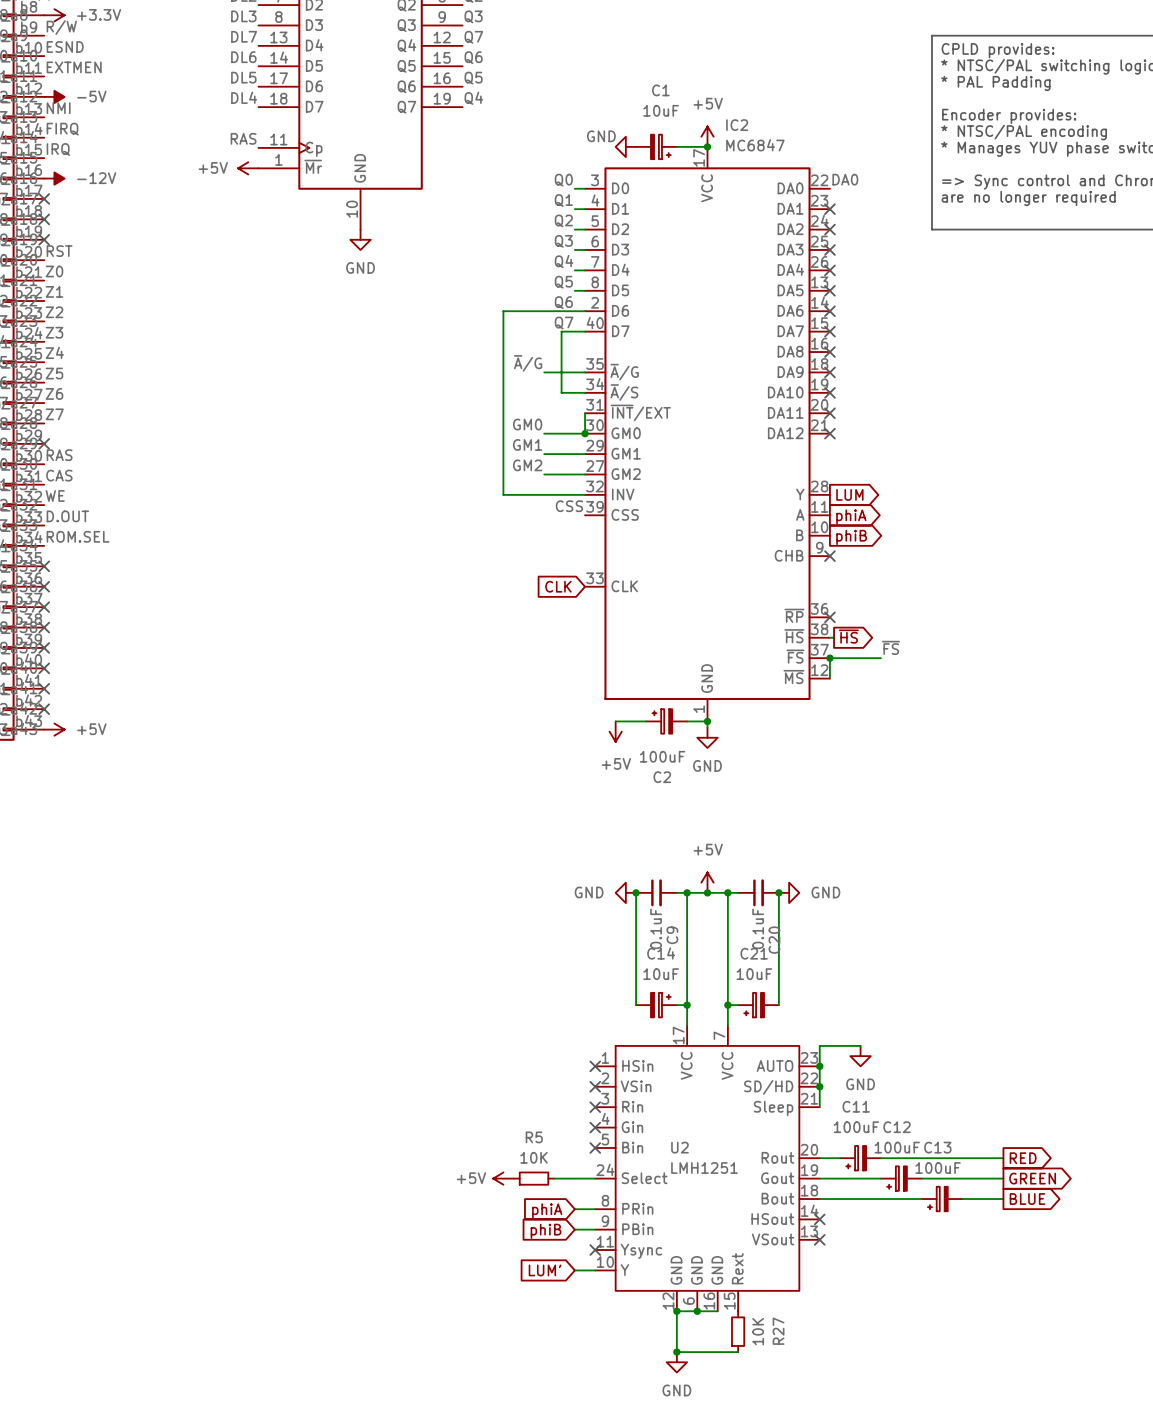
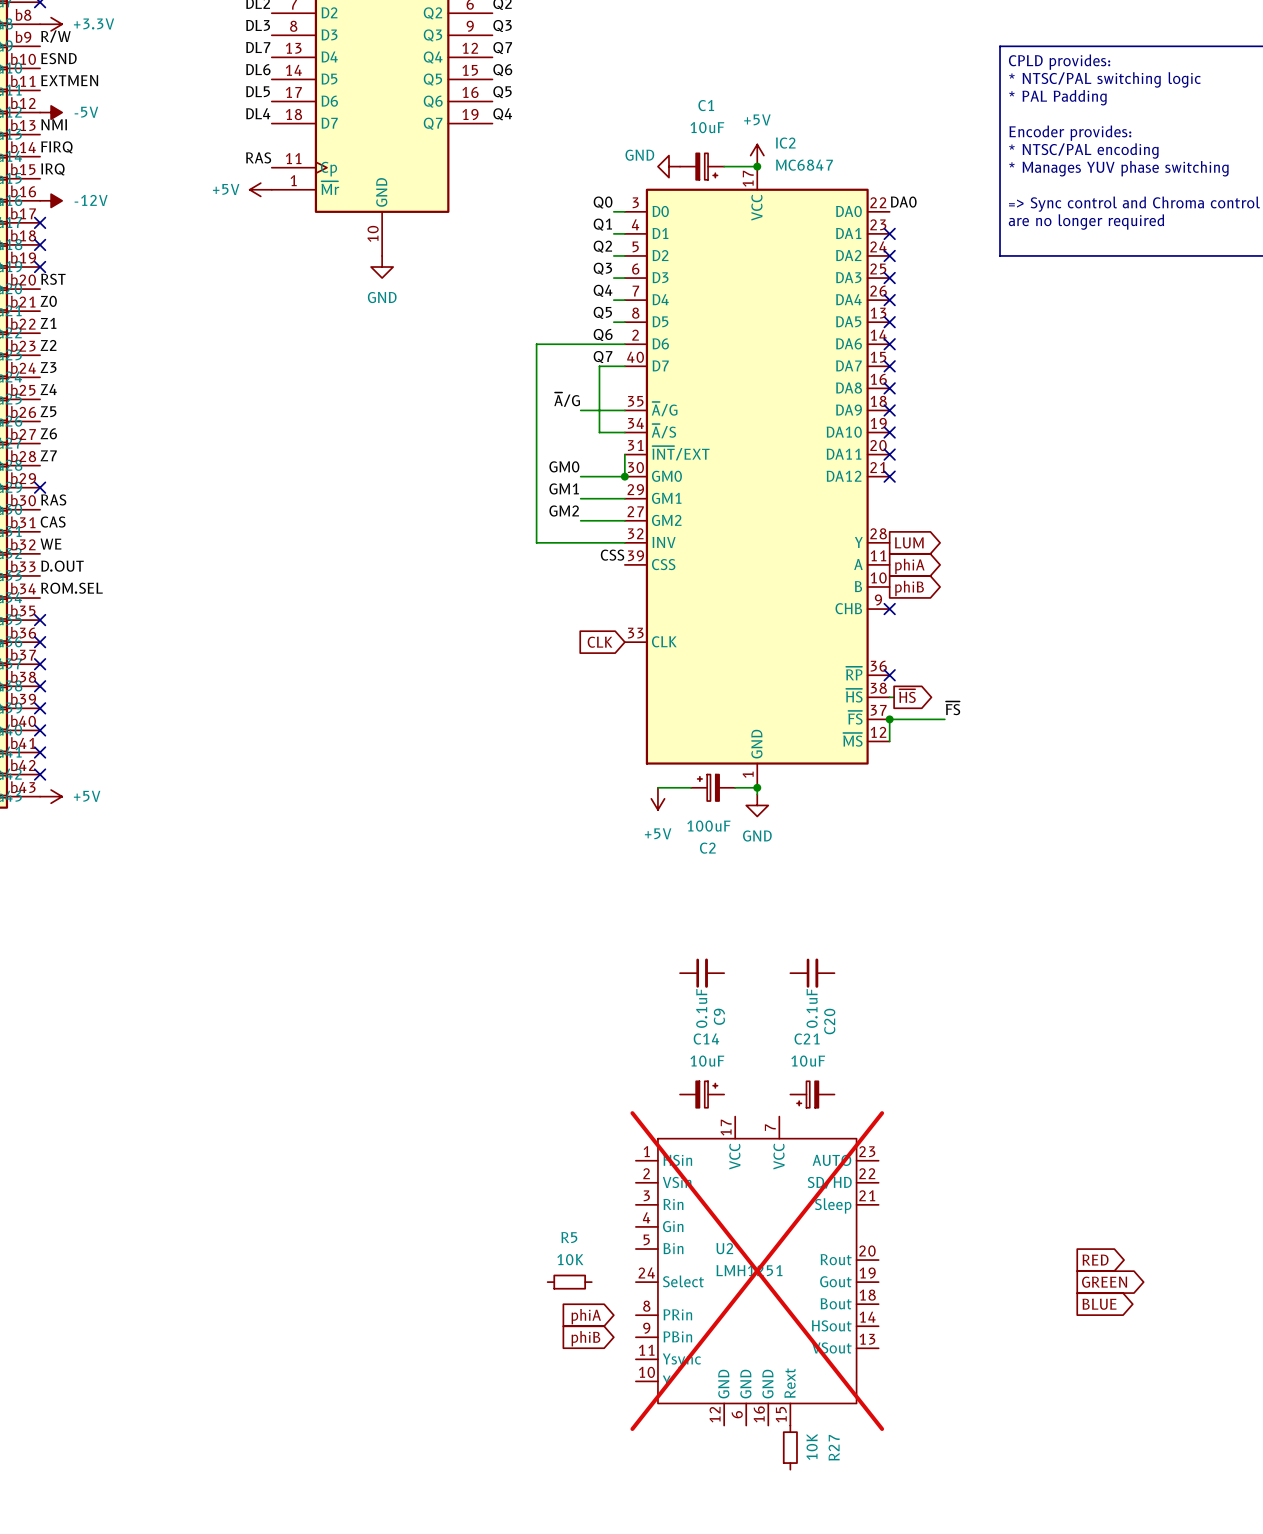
power symbol: +5V (707, 882) -> none
power symbol: GND (625, 892) -> none
wire: (636, 892) (636, 1005) -> none
junction: (636, 892) -> none
wire: (676, 892) (738, 892) -> none
wire: (687, 892) (687, 1025) -> none
junction: (687, 892) -> none
junction: (707, 892) -> none
wire: (727, 892) (727, 1025) -> none
junction: (727, 892) -> none
wire: (778, 892) (778, 1005) -> none
junction: (778, 892) -> none
power symbol: GND (789, 892) -> none
wire: (676, 1005) (687, 1005) -> none
junction: (687, 1005) -> none
wire: (727, 1005) (738, 1005) -> none
junction: (727, 1005) -> none
wire: (860, 1045) (819, 1045) (819, 1107) -> none
power symbol: GND (860, 1056) -> none
no-connect mark: (595, 1066) -> none
junction: (819, 1066) -> none
no-connect mark: (595, 1086) -> none
junction: (819, 1086) -> none
no-connect mark: (595, 1107) -> none
no-connect mark: (595, 1127) -> none
no-connect mark: (595, 1147) -> none
wire: (819, 1158) (840, 1158) -> none
C11: 100uF (860, 1158) -> none
wire: (880, 1158) (1003, 1158) -> none
U2 do-not-place cross: none -> (757, 1271)
power symbol: +5V (503, 1178) -> none
wire: (554, 1178) (595, 1178) -> none
wire: (819, 1178) (880, 1178) -> none
C12: 100uF (901, 1178) -> none
wire: (921, 1178) (1003, 1178) -> none
wire: (819, 1199) (921, 1199) -> none
C13: 100uF (942, 1199) -> none
wire: (962, 1199) (1003, 1199) -> none
wire: (574, 1209) (595, 1209) -> none
no-connect mark: (819, 1219) -> none
wire: (574, 1229) (595, 1229) -> none
no-connect mark: (819, 1239) -> none
no-connect mark: (595, 1250) -> none
global label: LUM' (545, 1270) -> none
wire: (574, 1270) (595, 1270) -> none
junction: (676, 1311) -> none
junction: (697, 1311) -> none
wire: (717, 1311) (676, 1311) (676, 1352) (738, 1352) -> none
junction: (676, 1352) -> none
power symbol: GND (676, 1362) -> none

